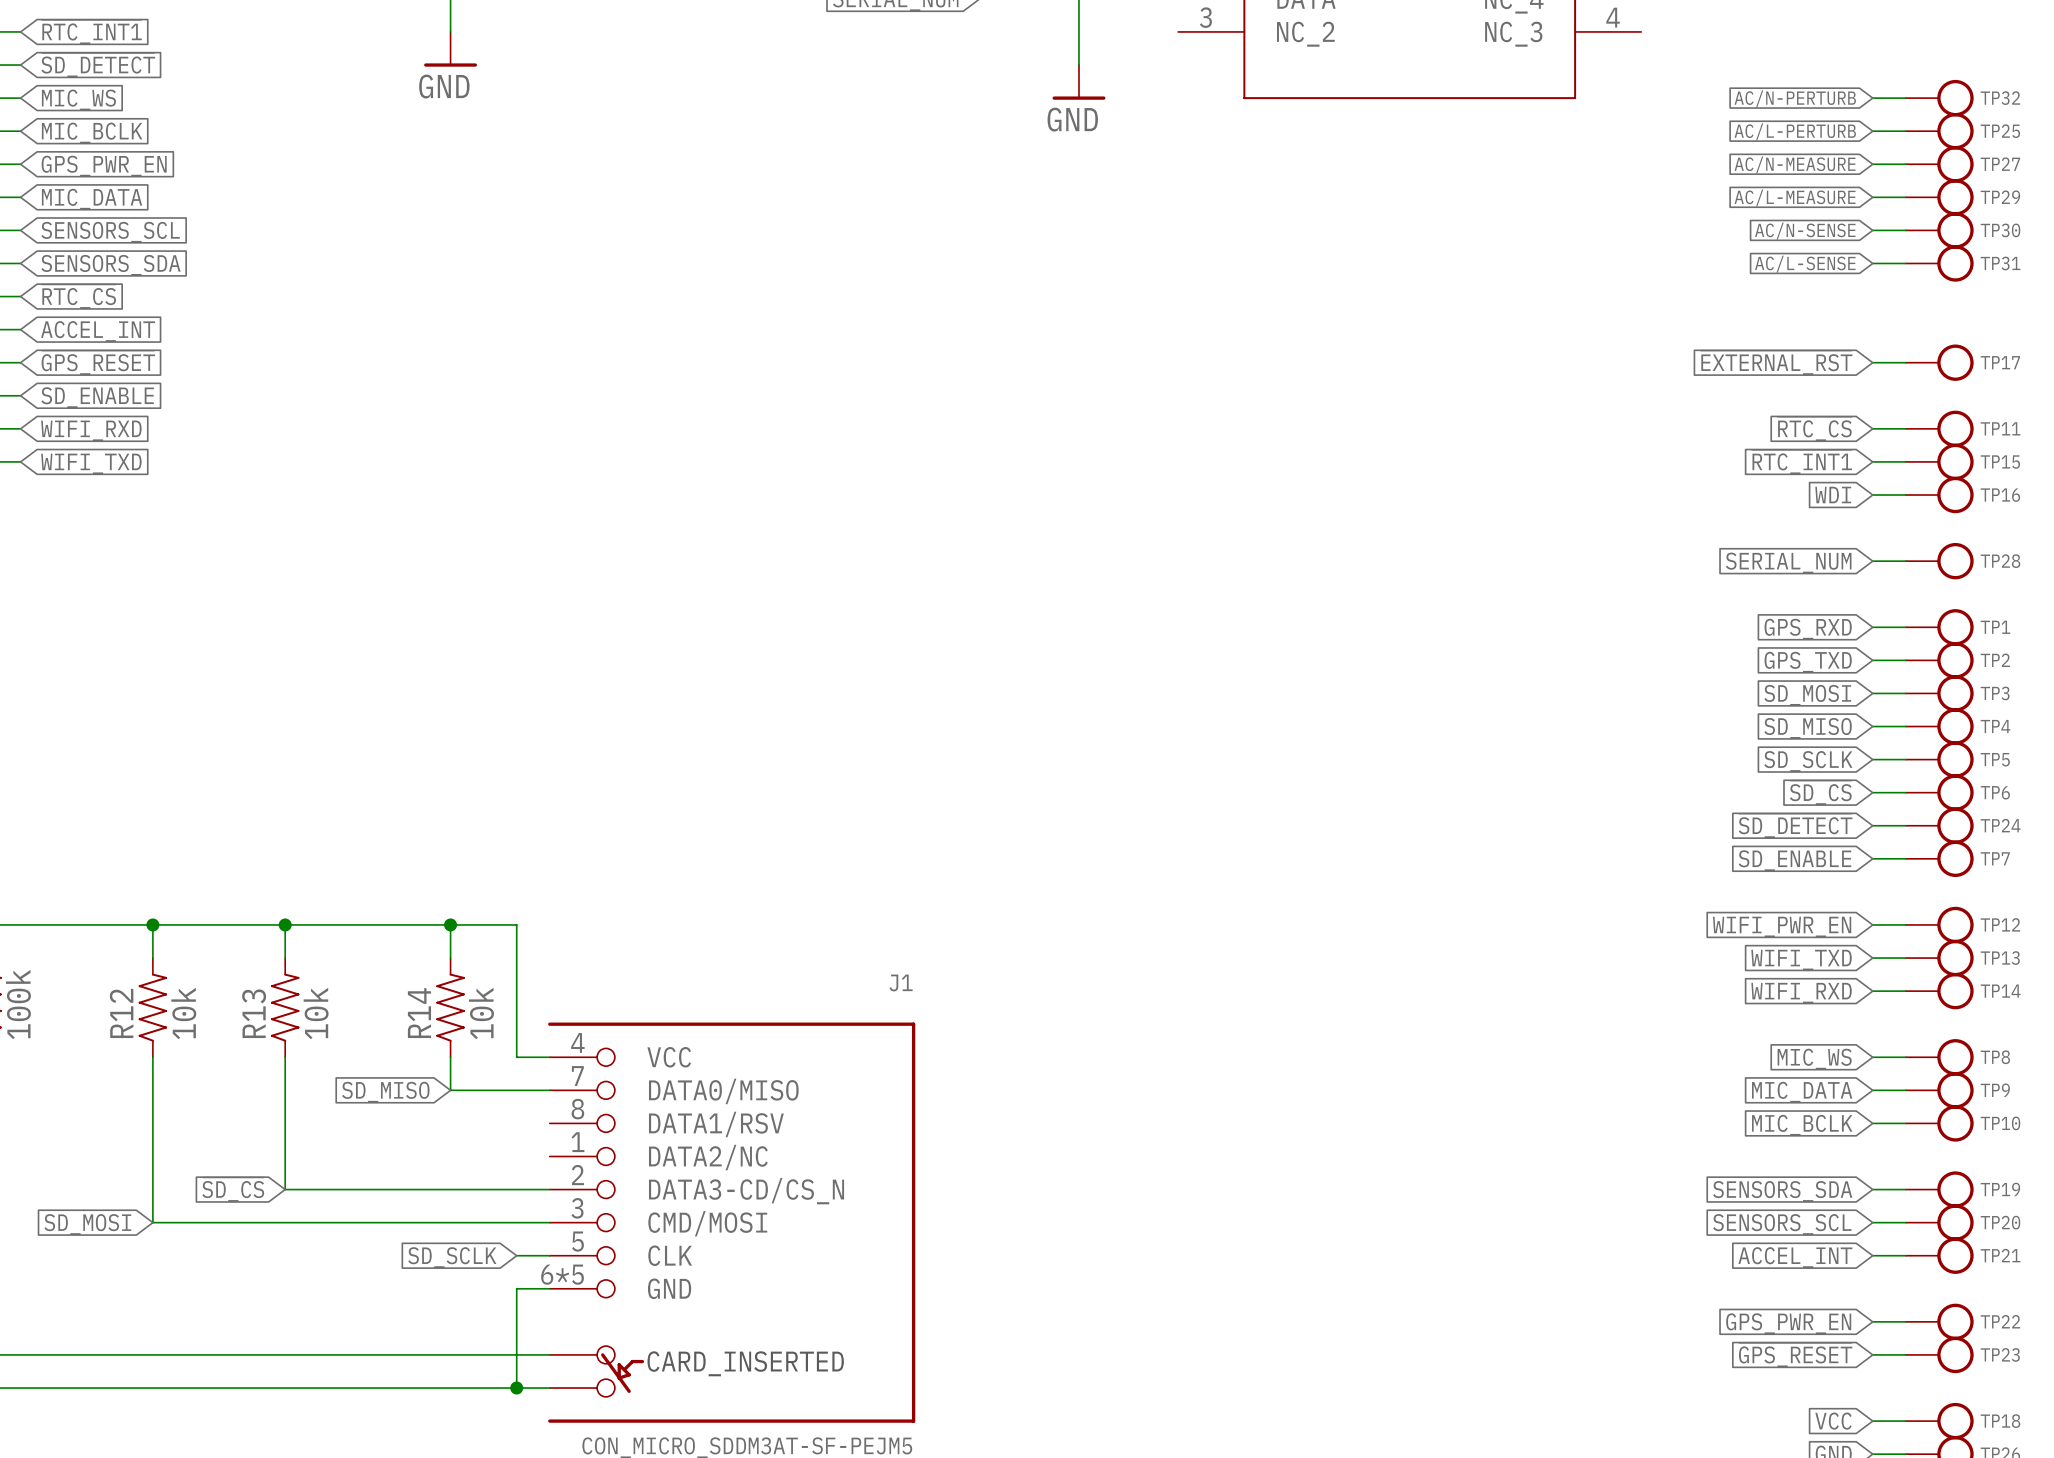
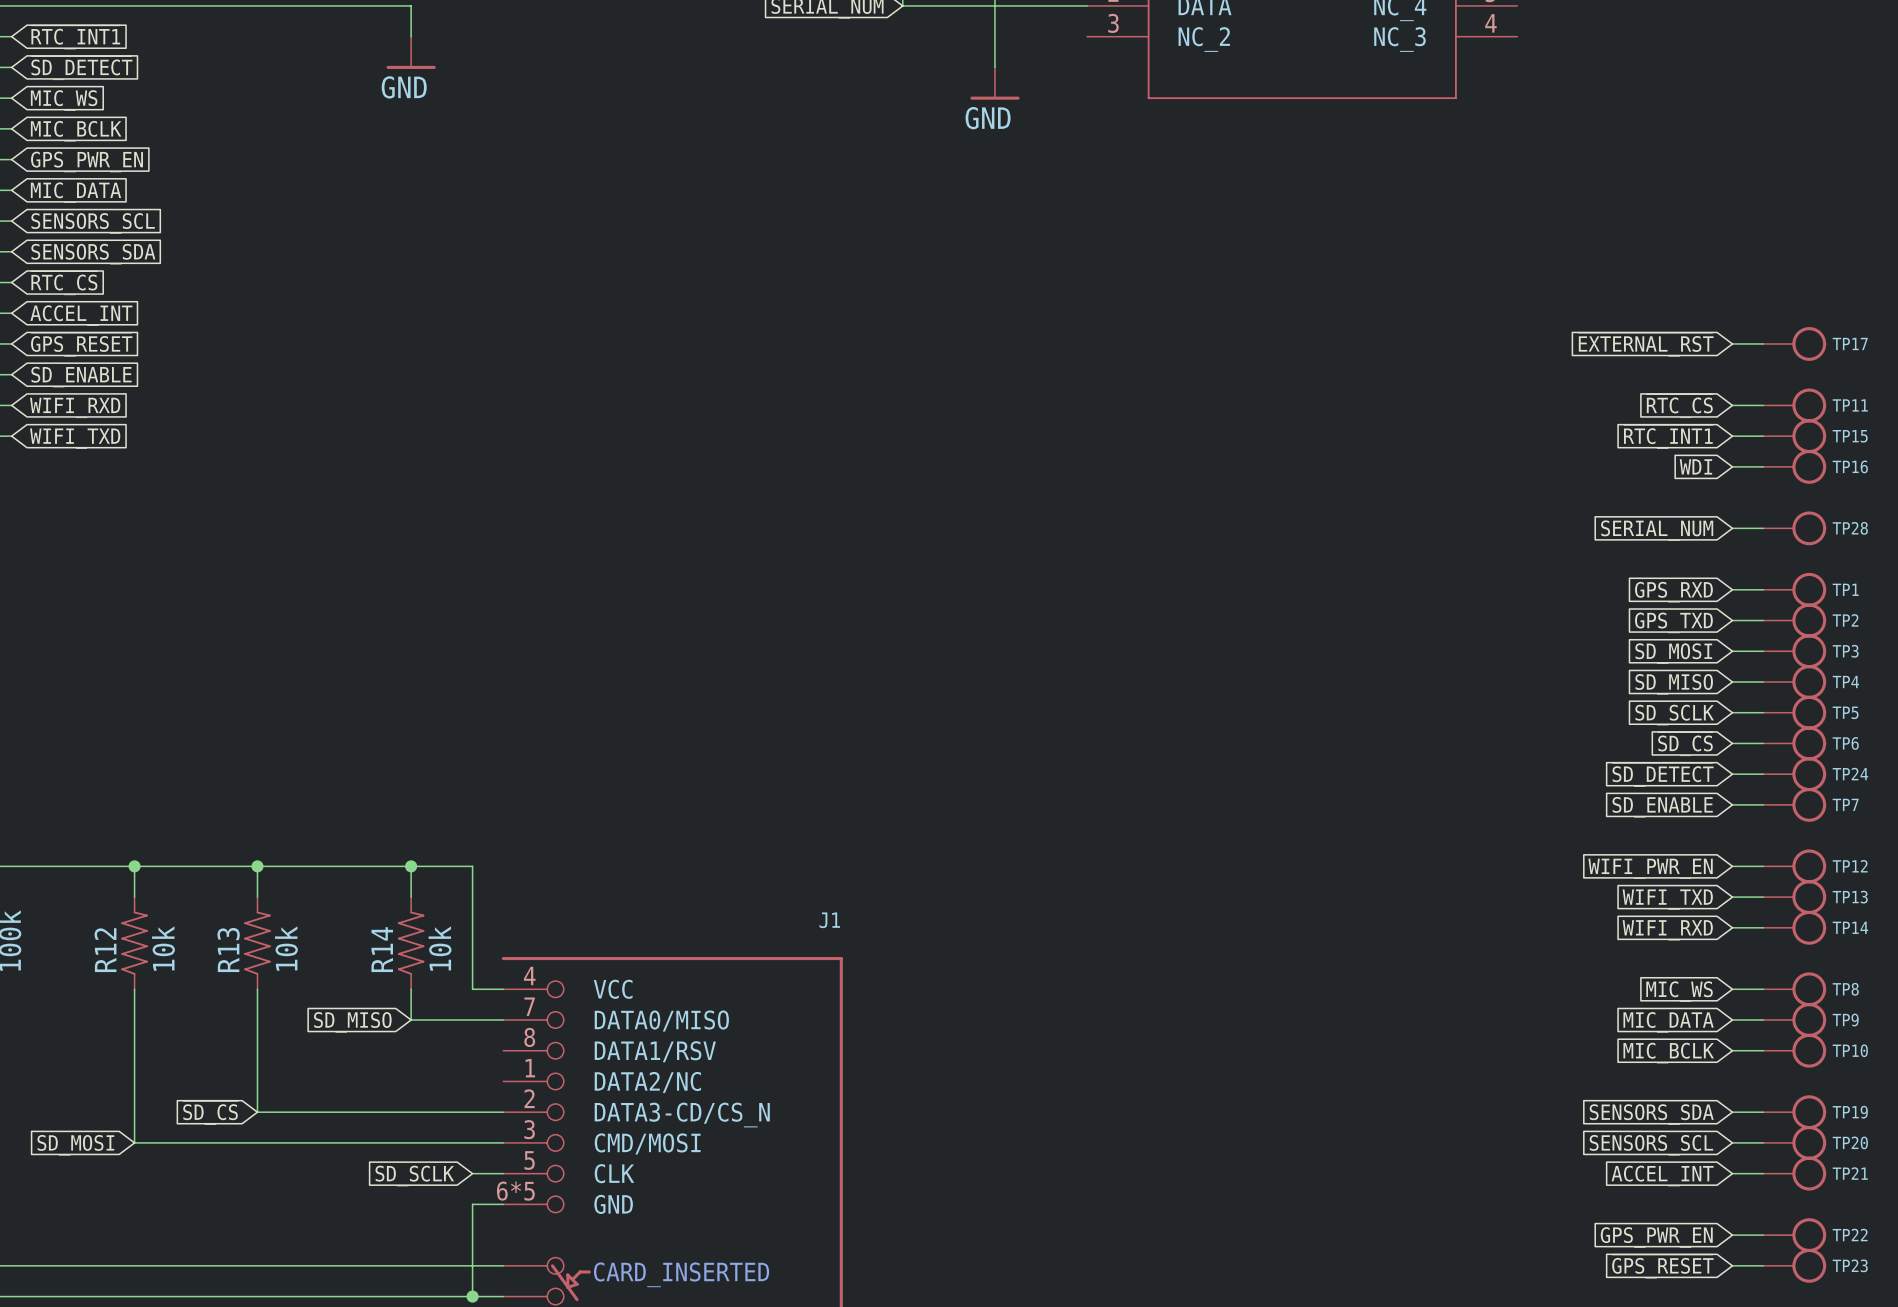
global label: AC/N-PERTURB (1795, 98) -> none
wire: (1872, 98) (1905, 98) -> none
TP32: (1939, 98) -> none
global label: AC/L-PERTURB (1795, 131) -> none
wire: (1872, 131) (1905, 131) -> none
TP25: (1939, 131) -> none
global label: AC/N-MEASURE (1795, 164) -> none
wire: (1872, 164) (1905, 164) -> none
TP27: (1939, 164) -> none
wire: (1872, 197) (1905, 197) -> none
TP29: (1939, 197) -> none
global label: AC/L-MEASURE (1795, 198) -> none
wire: (1872, 230) (1905, 230) -> none
TP30: (1939, 230) -> none
global label: AC/N-SENSE (1805, 231) -> none
wire: (1872, 263) (1905, 263) -> none
TP31: (1939, 263) -> none
global label: AC/L-SENSE (1805, 264) -> none

